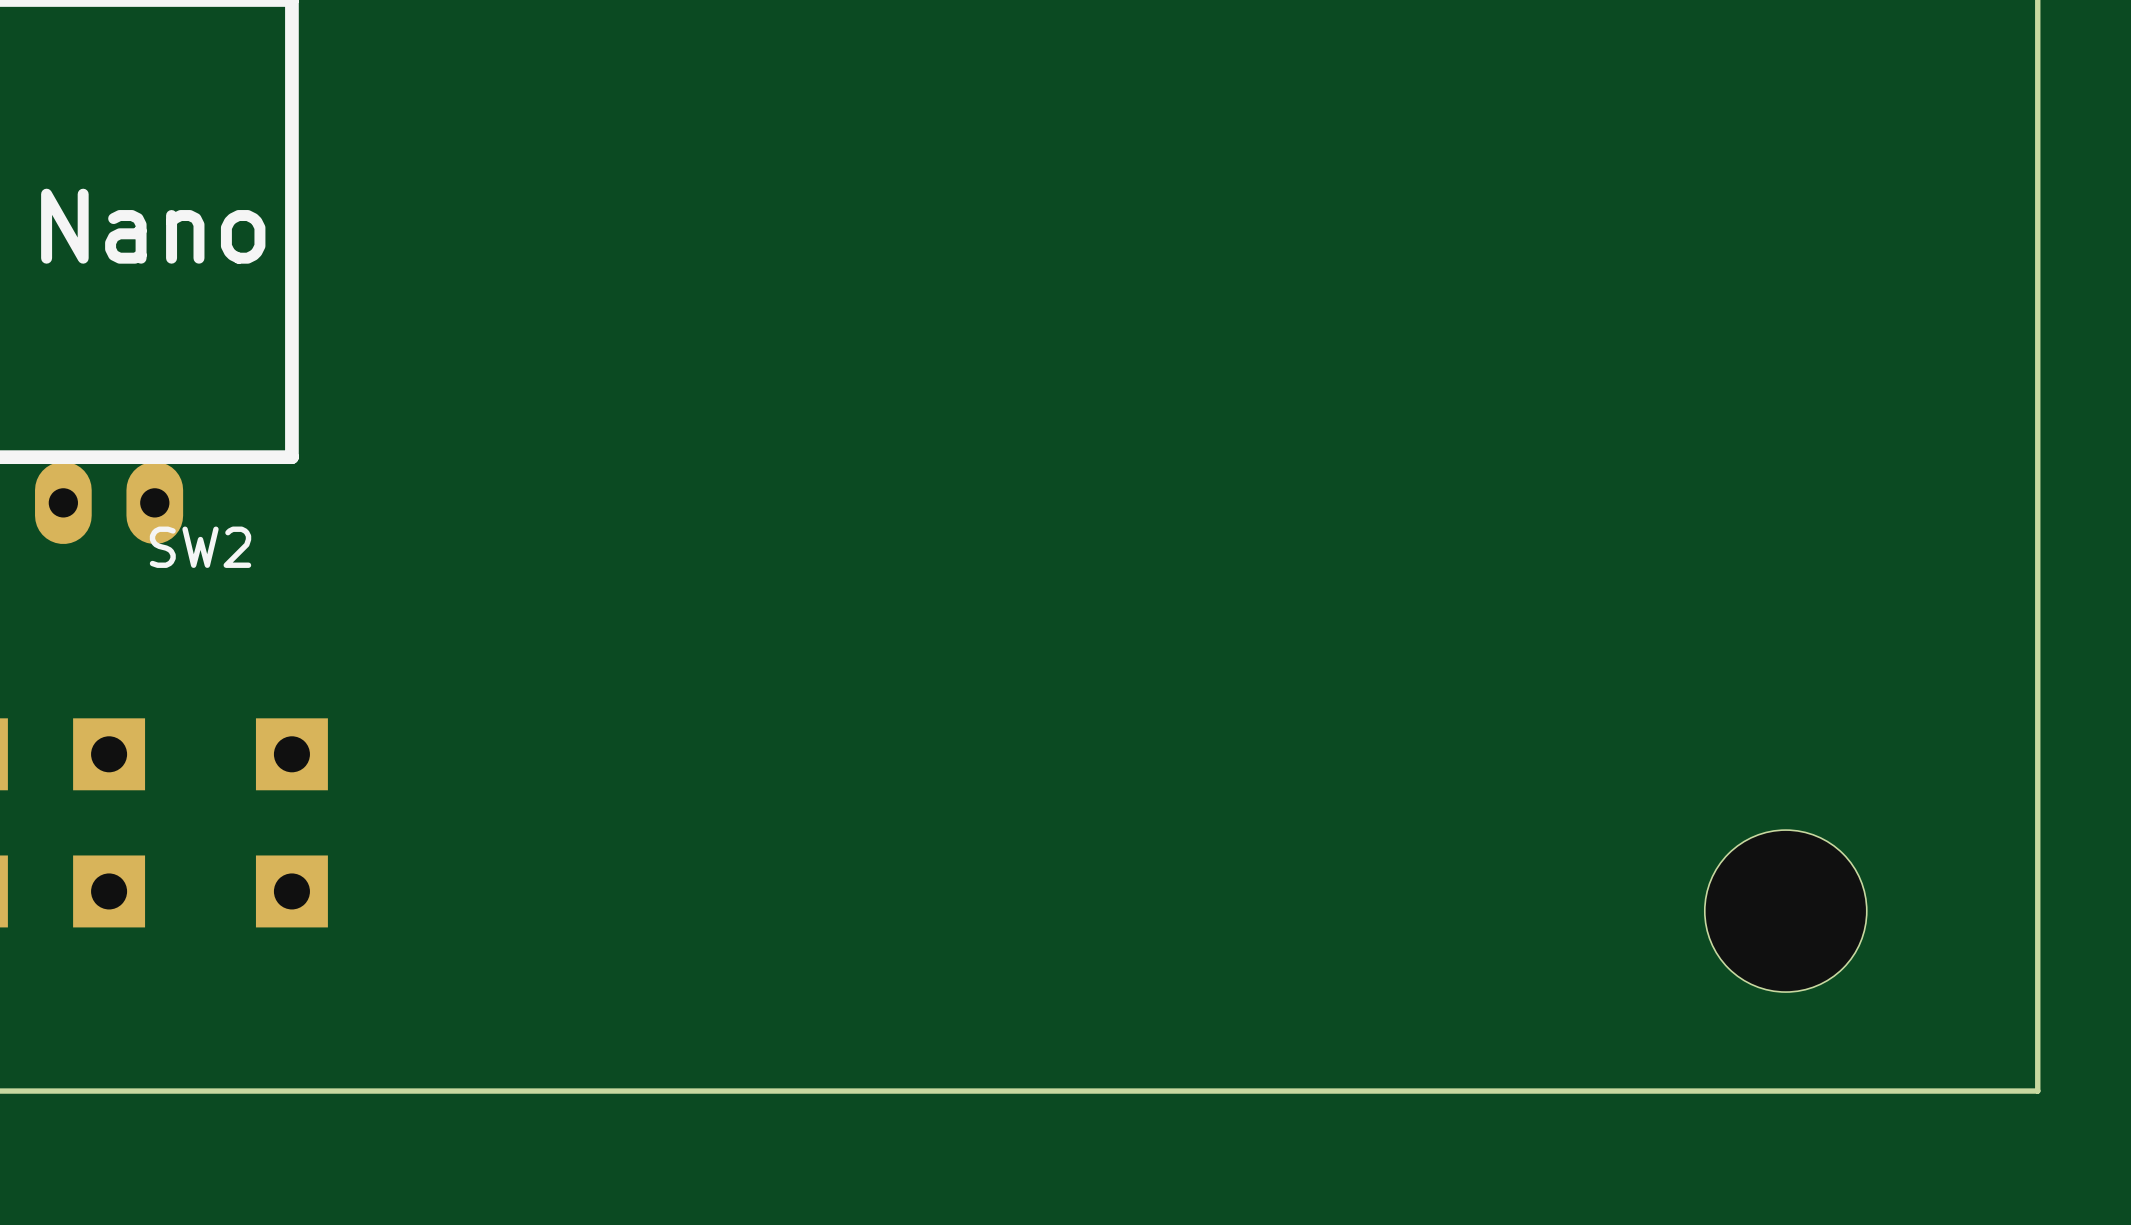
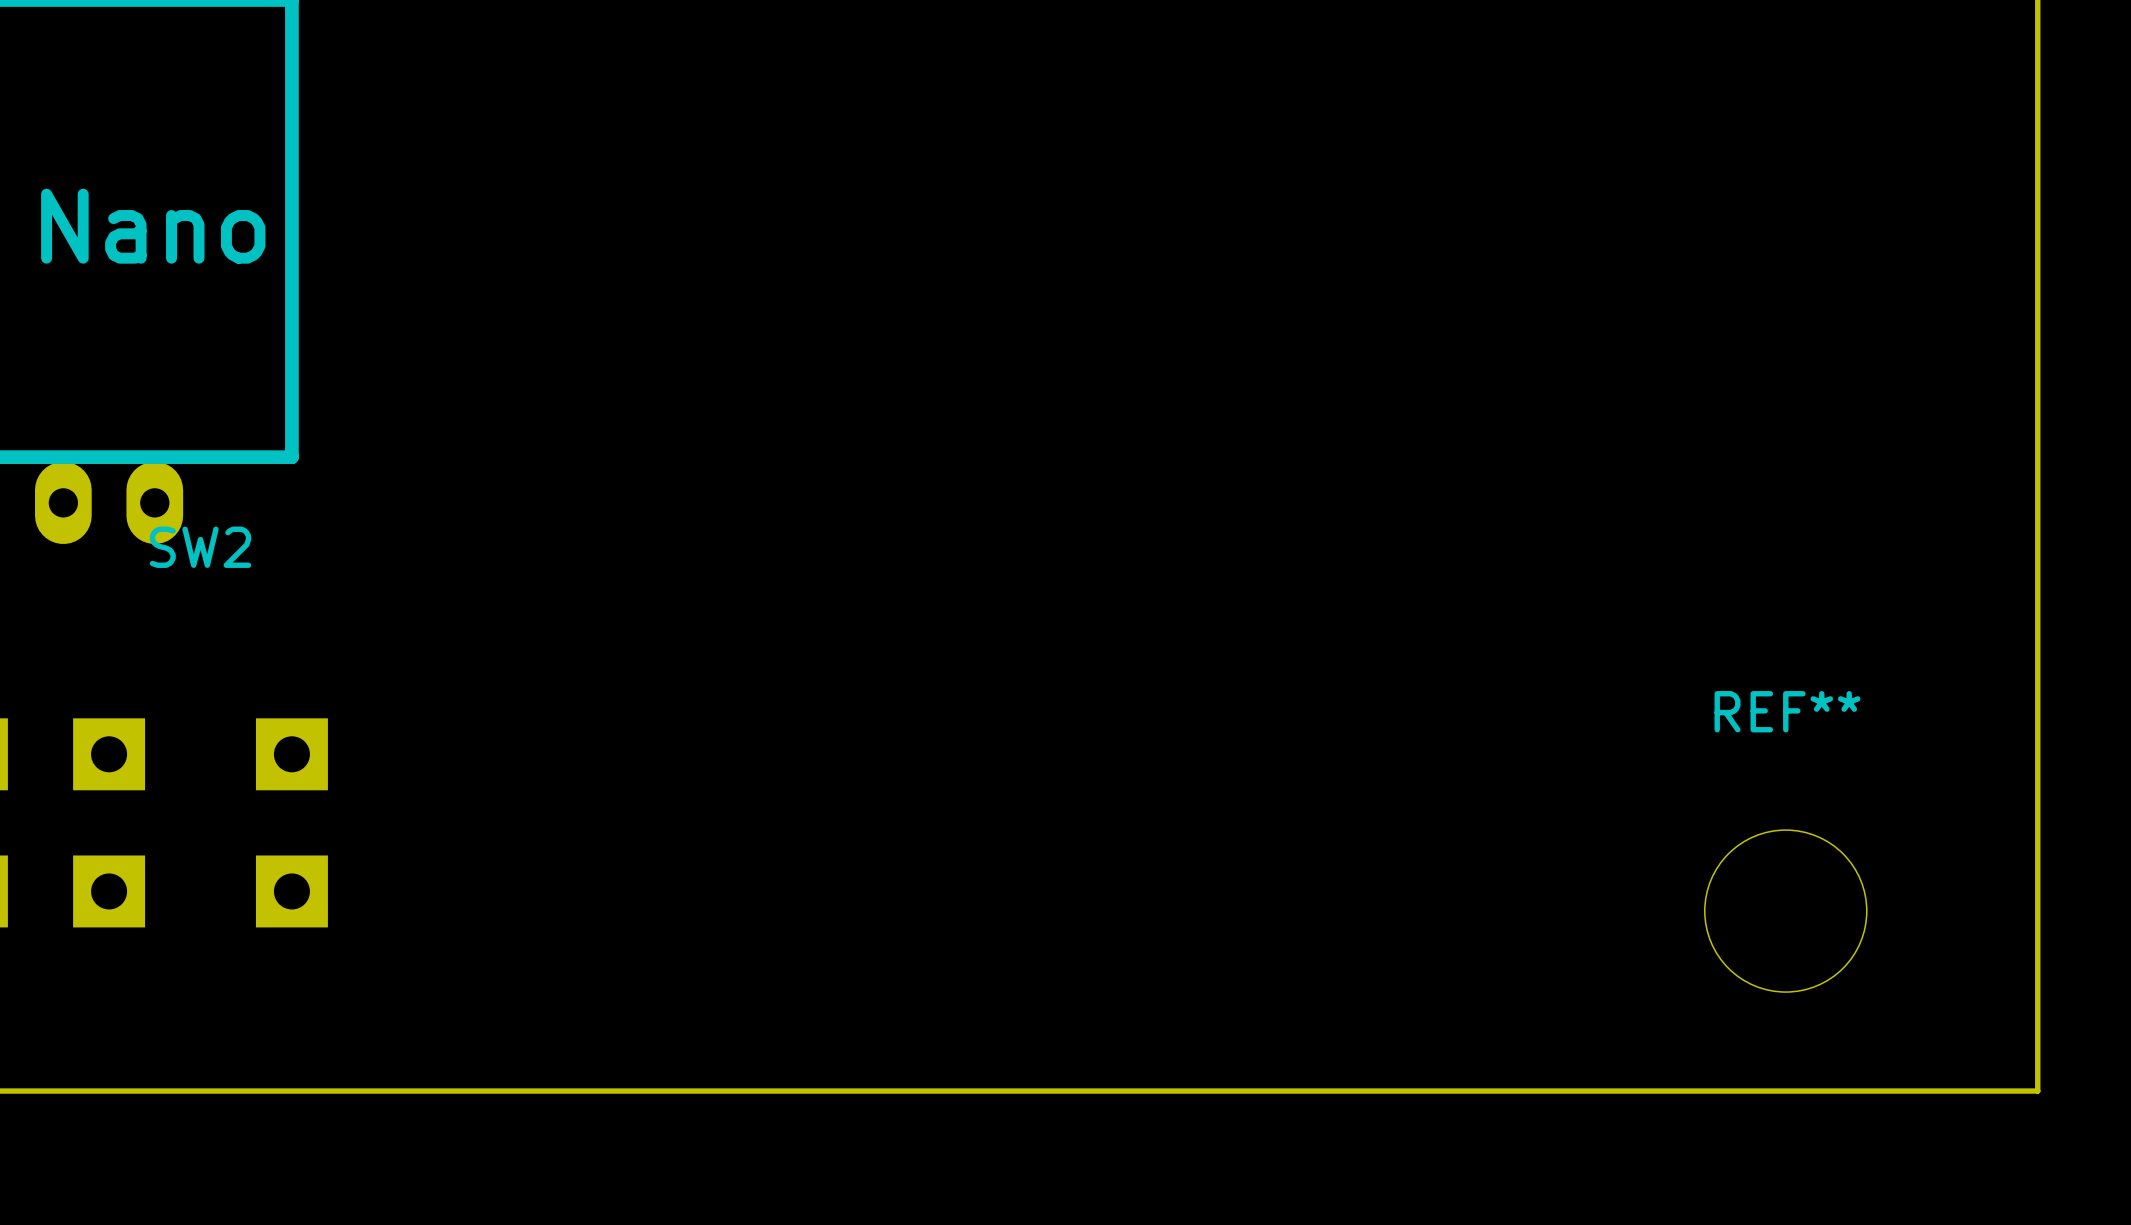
REF** name: none -> REF** (1787, 711)

